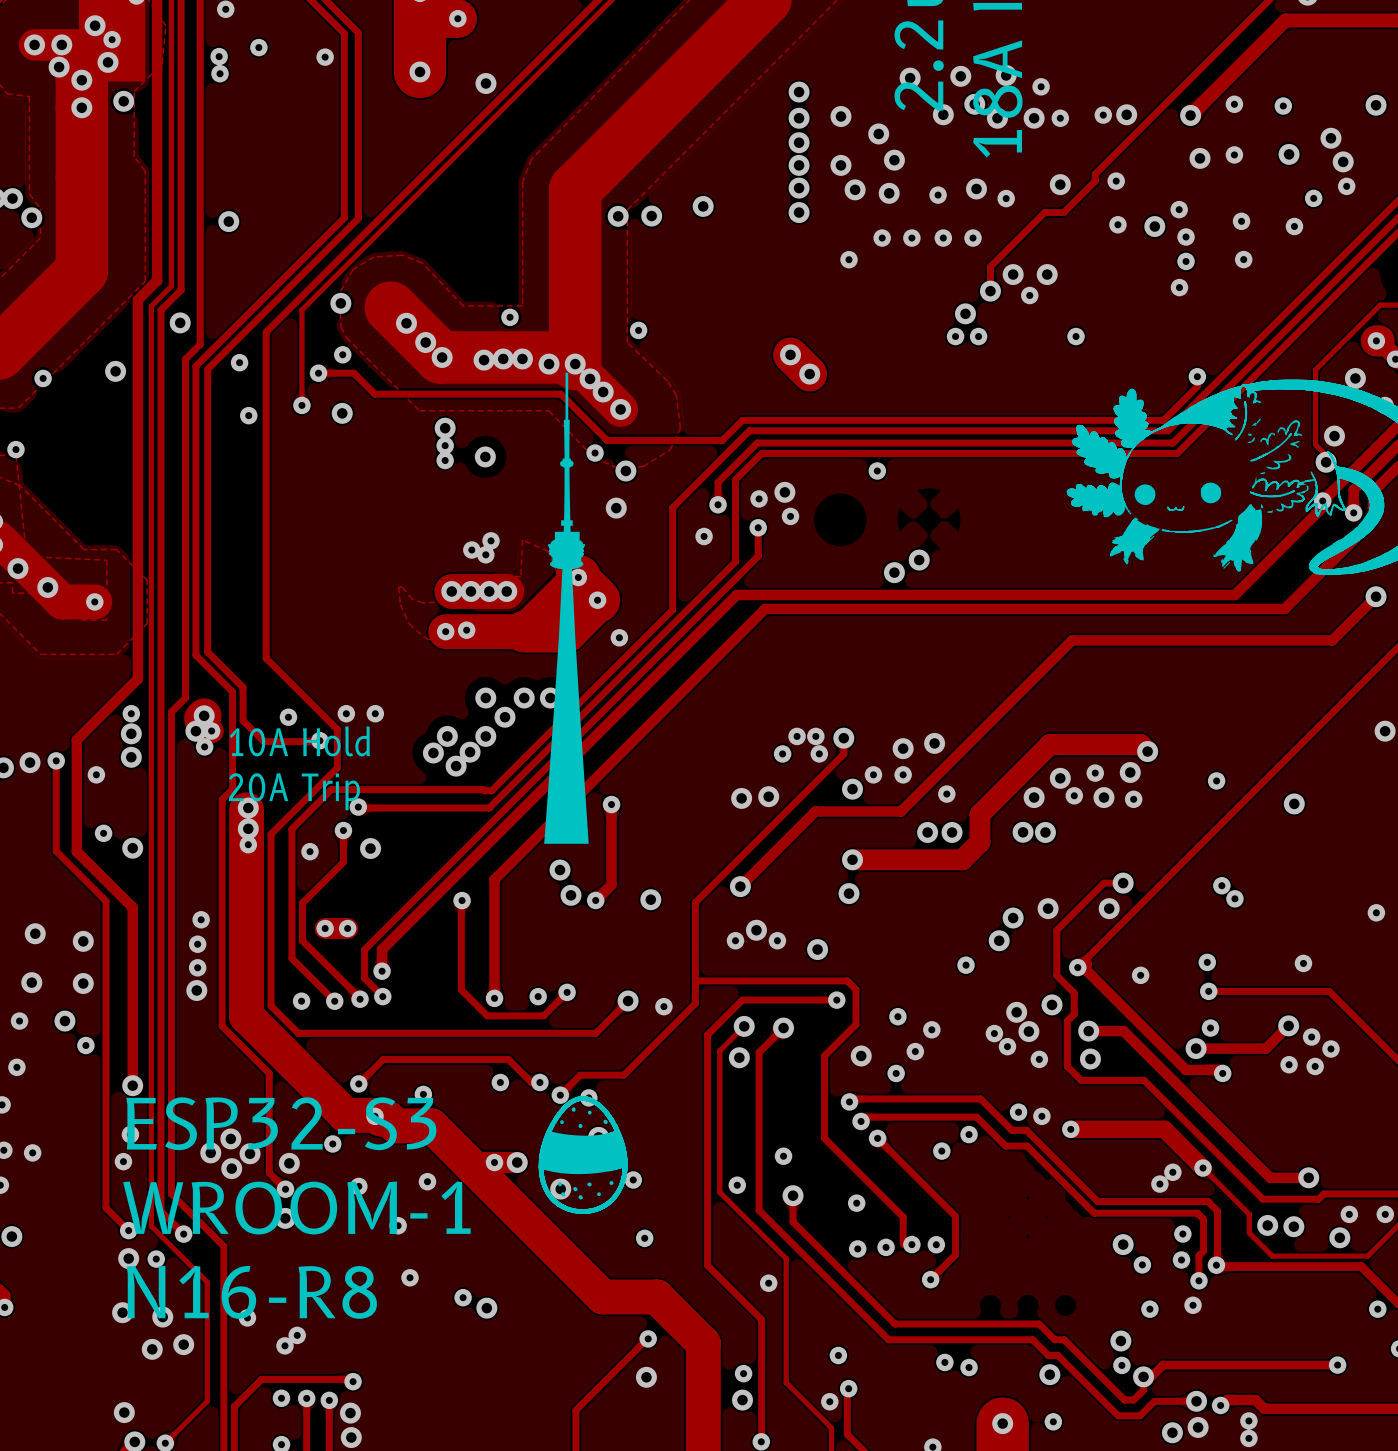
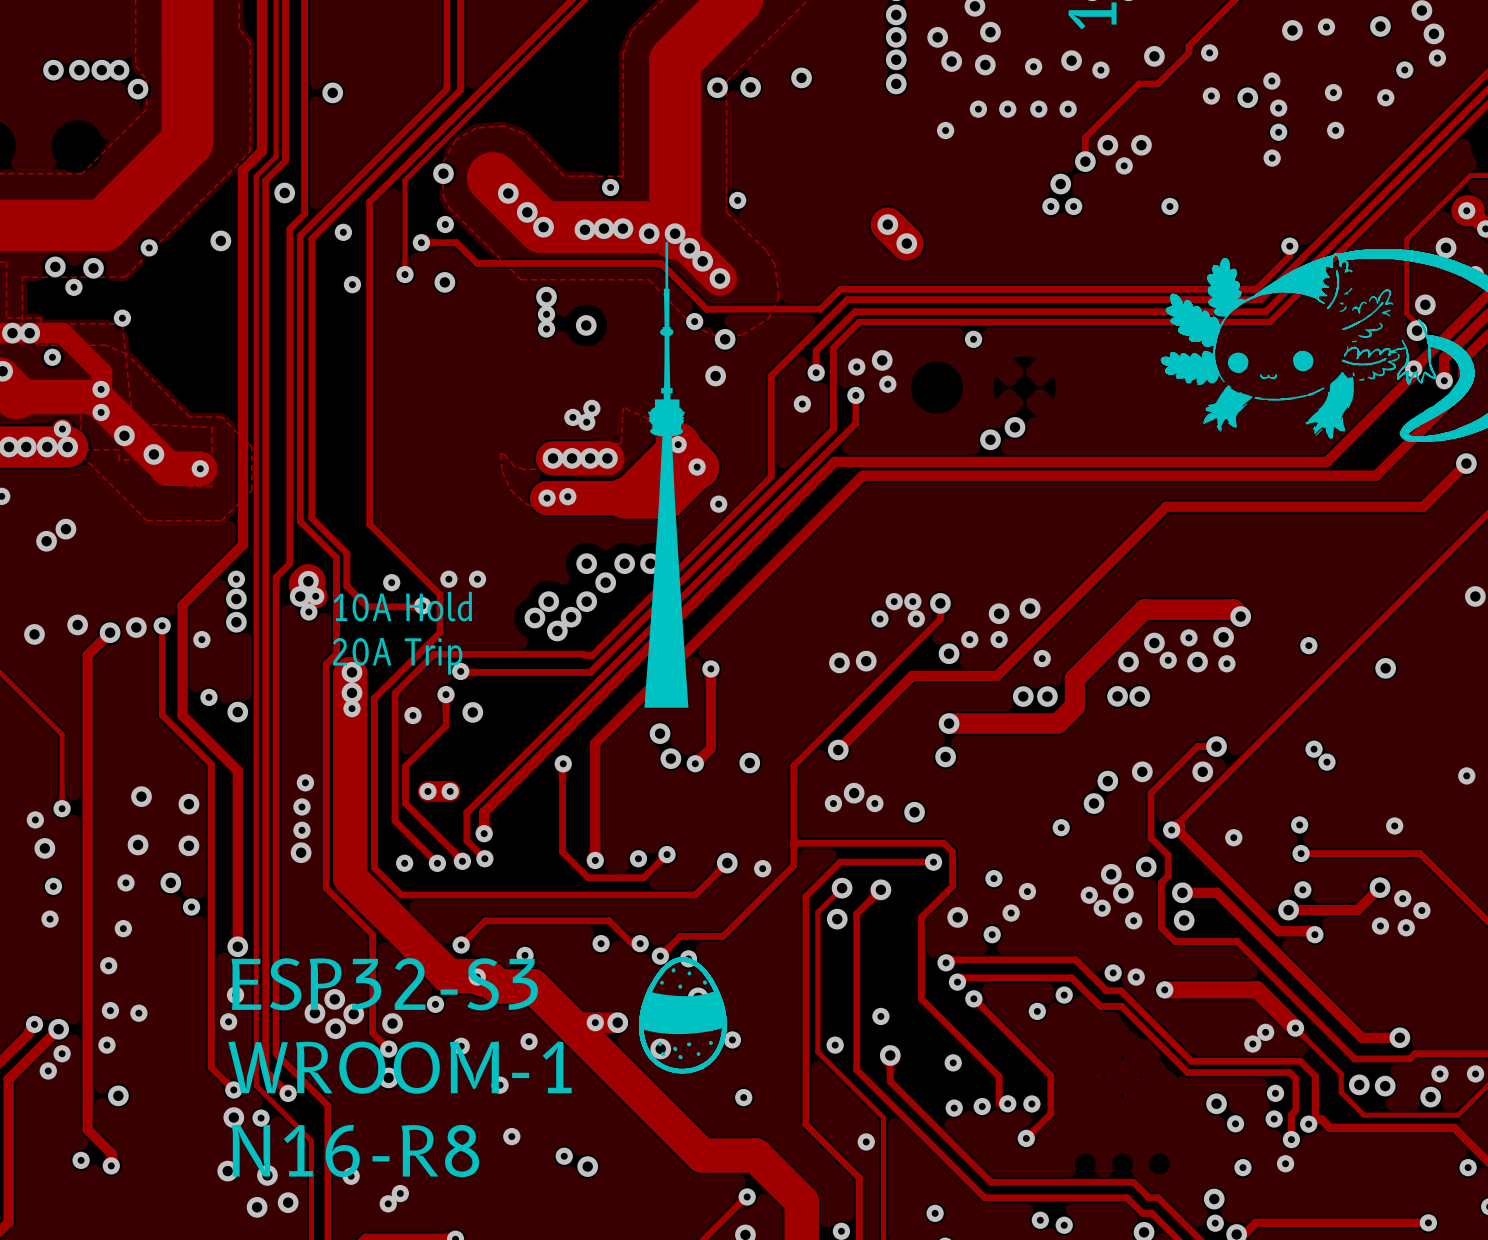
track: (1217, 1211) (1216, 1265) -> none
track: (1216, 1265) (1361, 1266) (1363, 1269) -> (1309, 1070) (1315, 1076) (1315, 1117) (1321, 1119) (1330, 1127) (1454, 1127)

